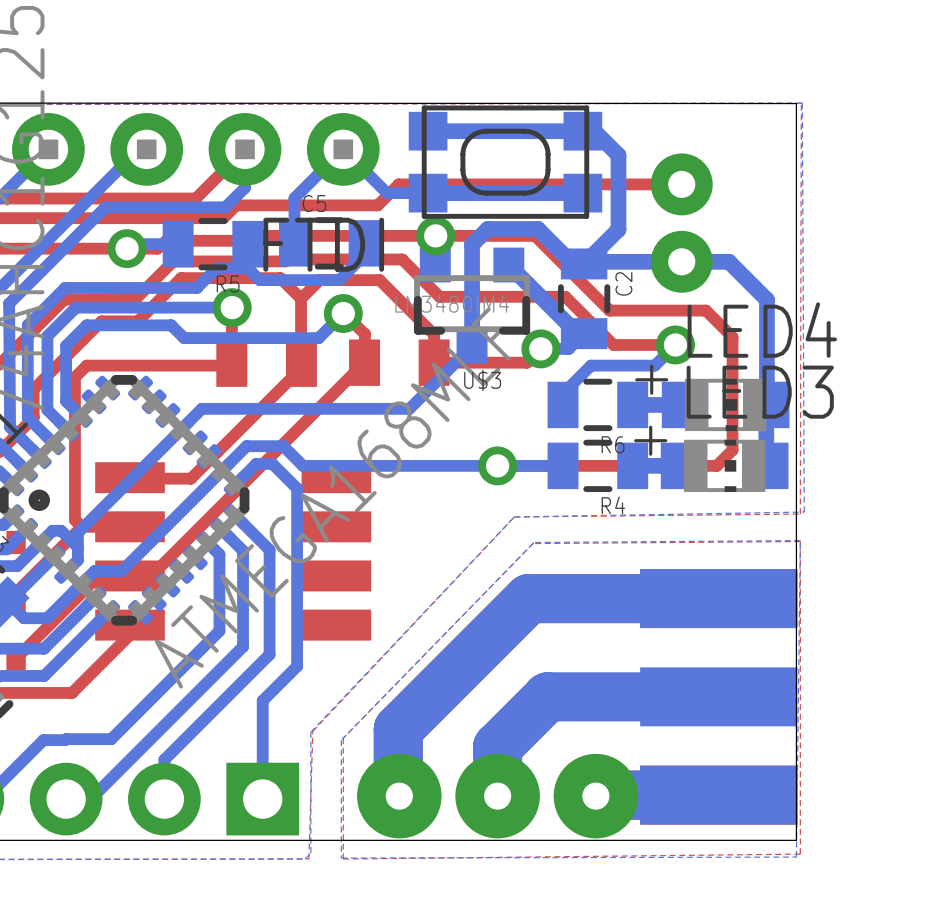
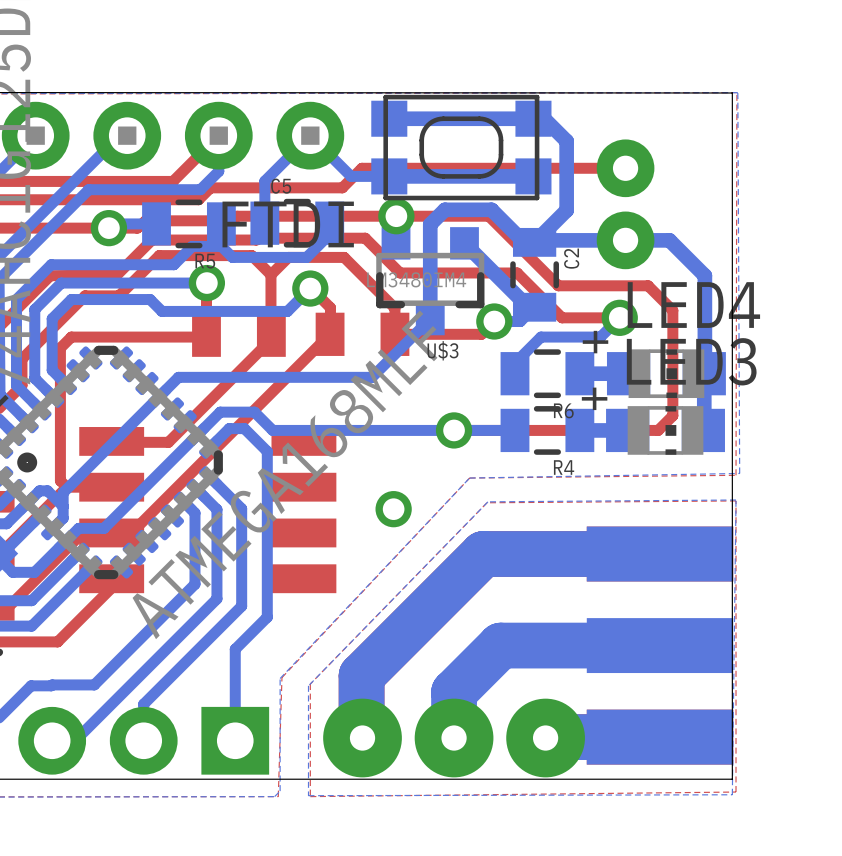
via: none -> (393, 509)

